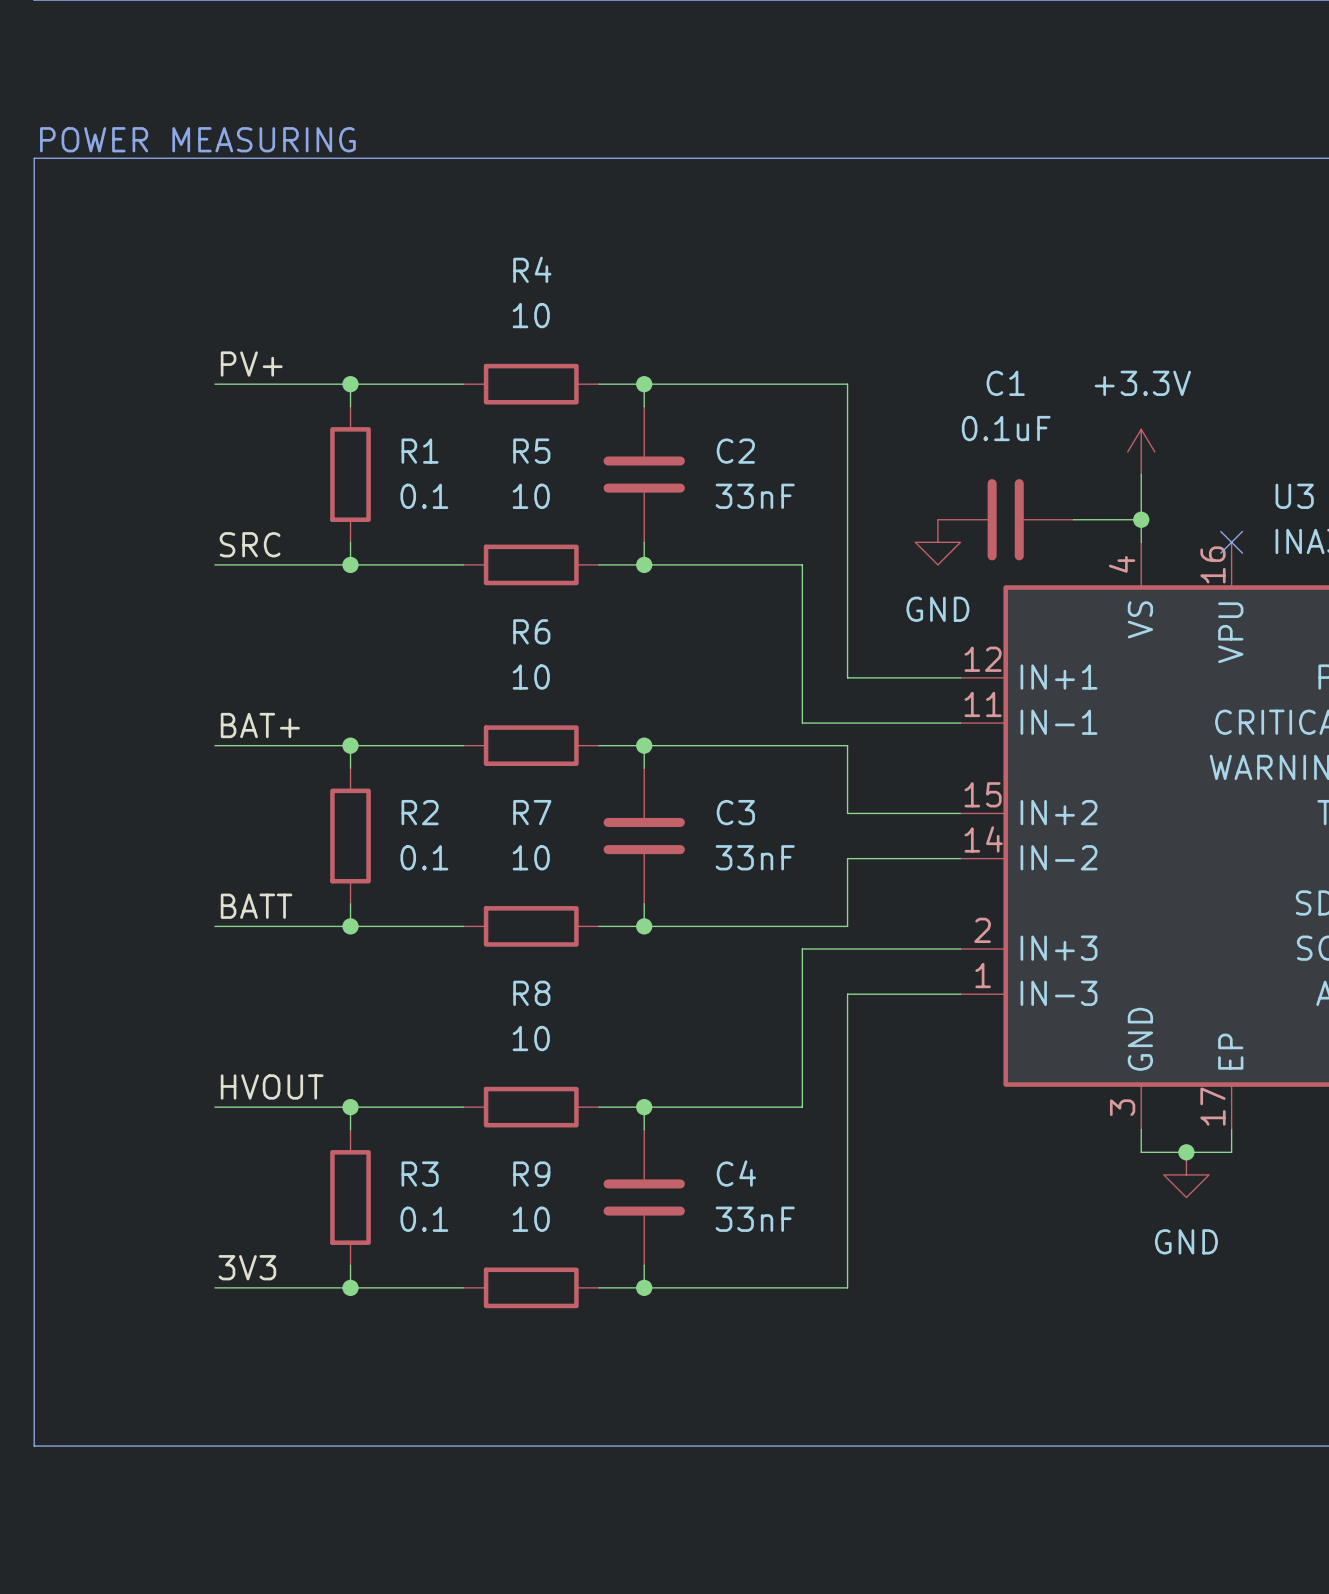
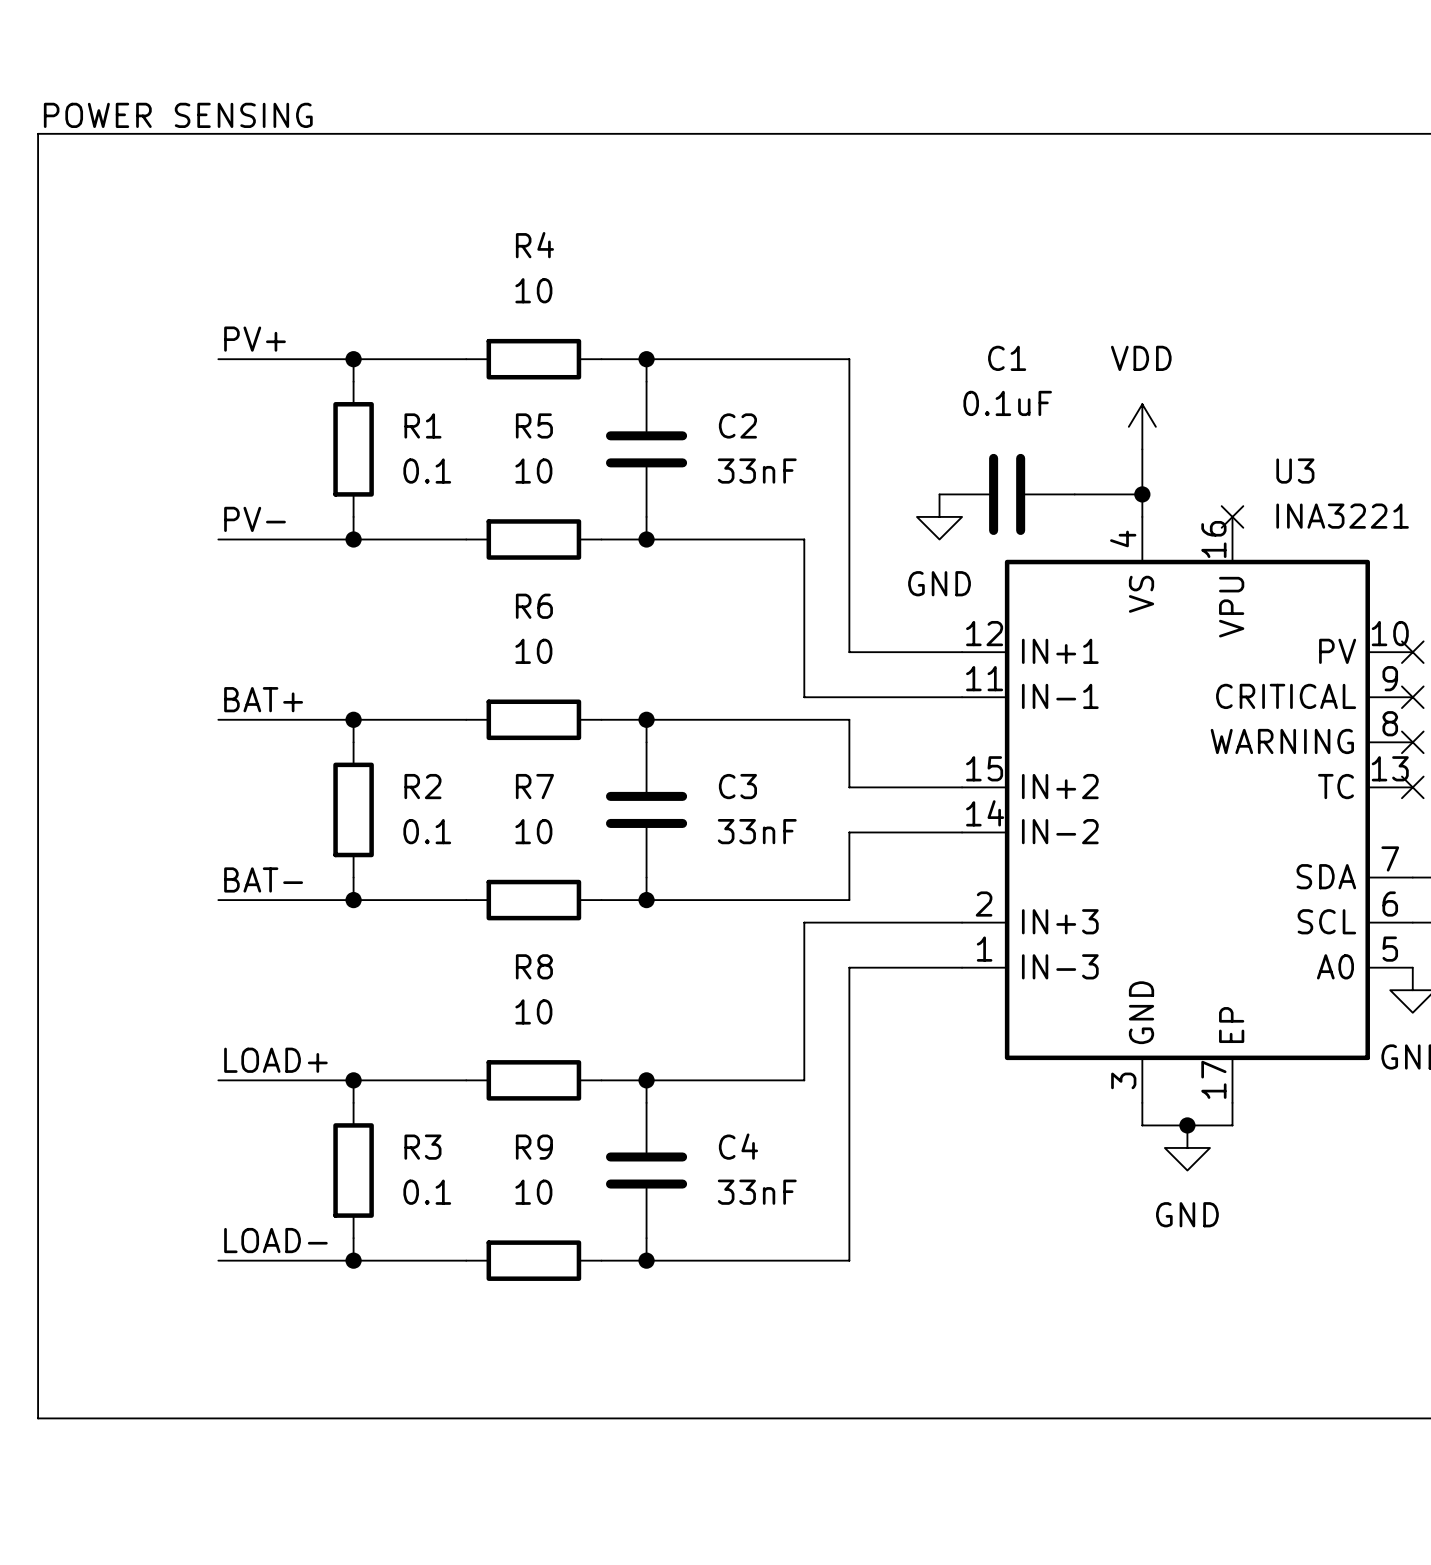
text: POWER MEASURING (197, 139) -> POWER SENSING (178, 115)
power symbol: +3.3V (1141, 451) -> VDD (1142, 426)
label: SRC (250, 544) -> PV- (255, 519)
label: BATT (256, 906) -> BAT- (263, 879)
label: HVOUT (272, 1086) -> LOAD+ (275, 1060)
label: 3V3 (247, 1267) -> LOAD- (275, 1240)

